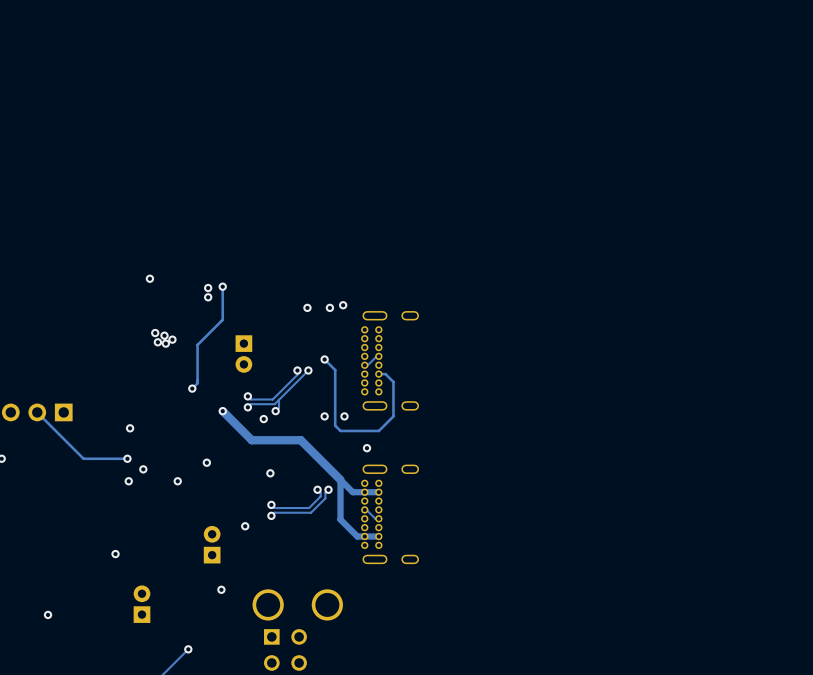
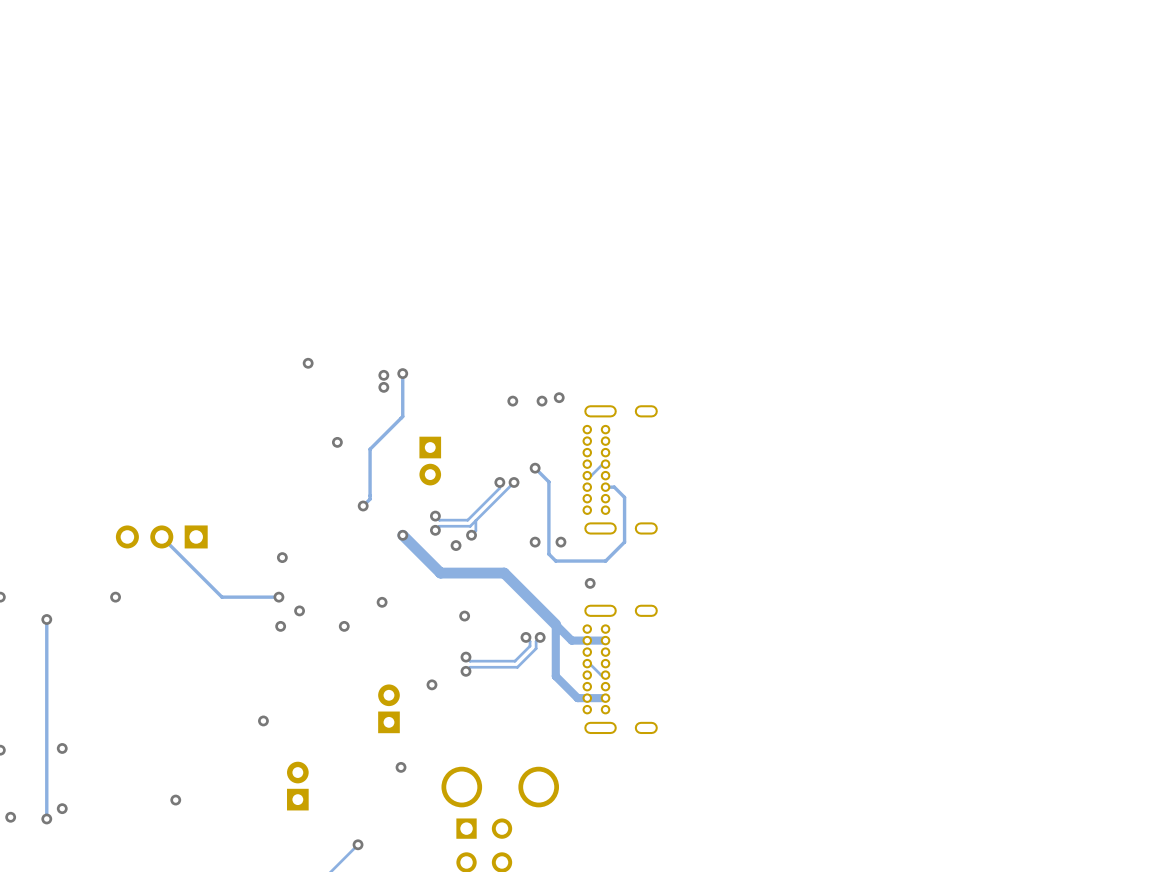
via: (155, 333) -> none
via: (164, 335) -> none
via: (157, 342) -> none
via: (165, 343) -> none

